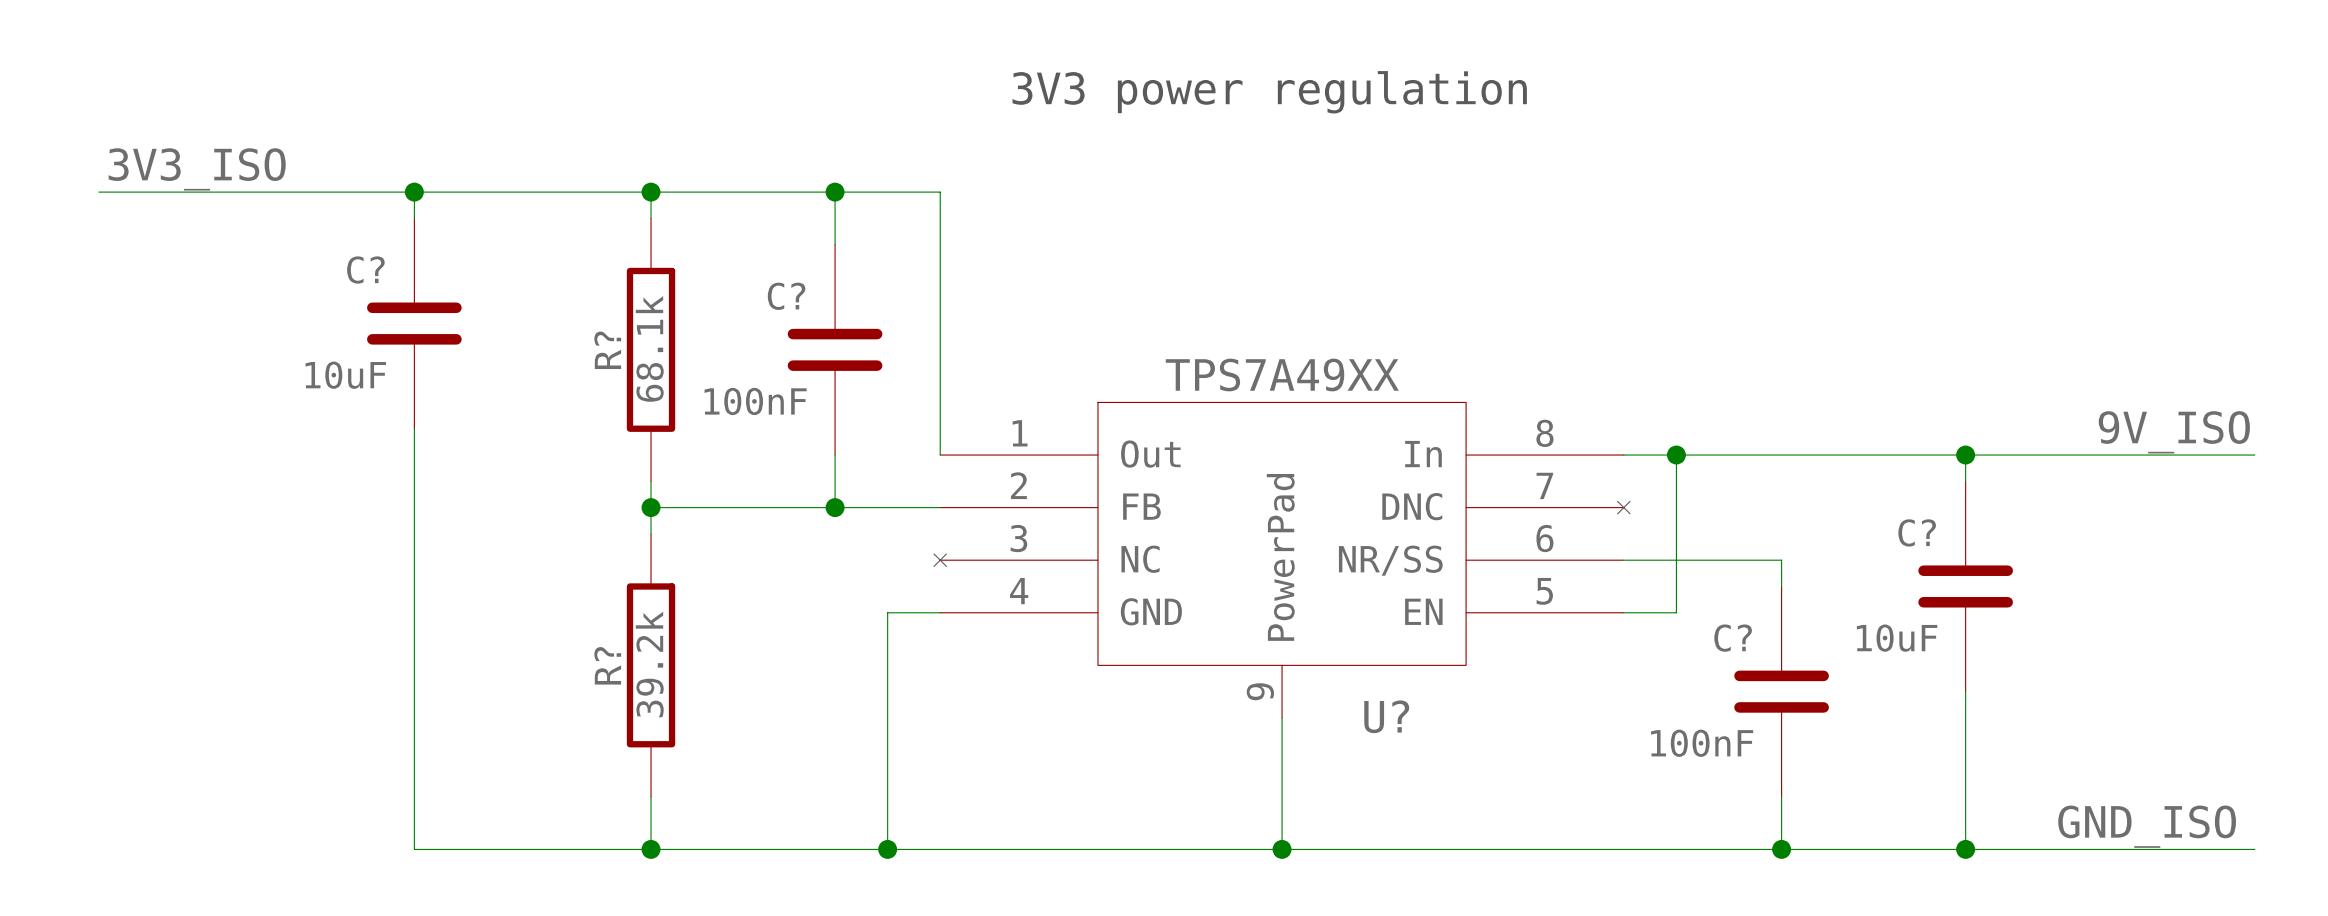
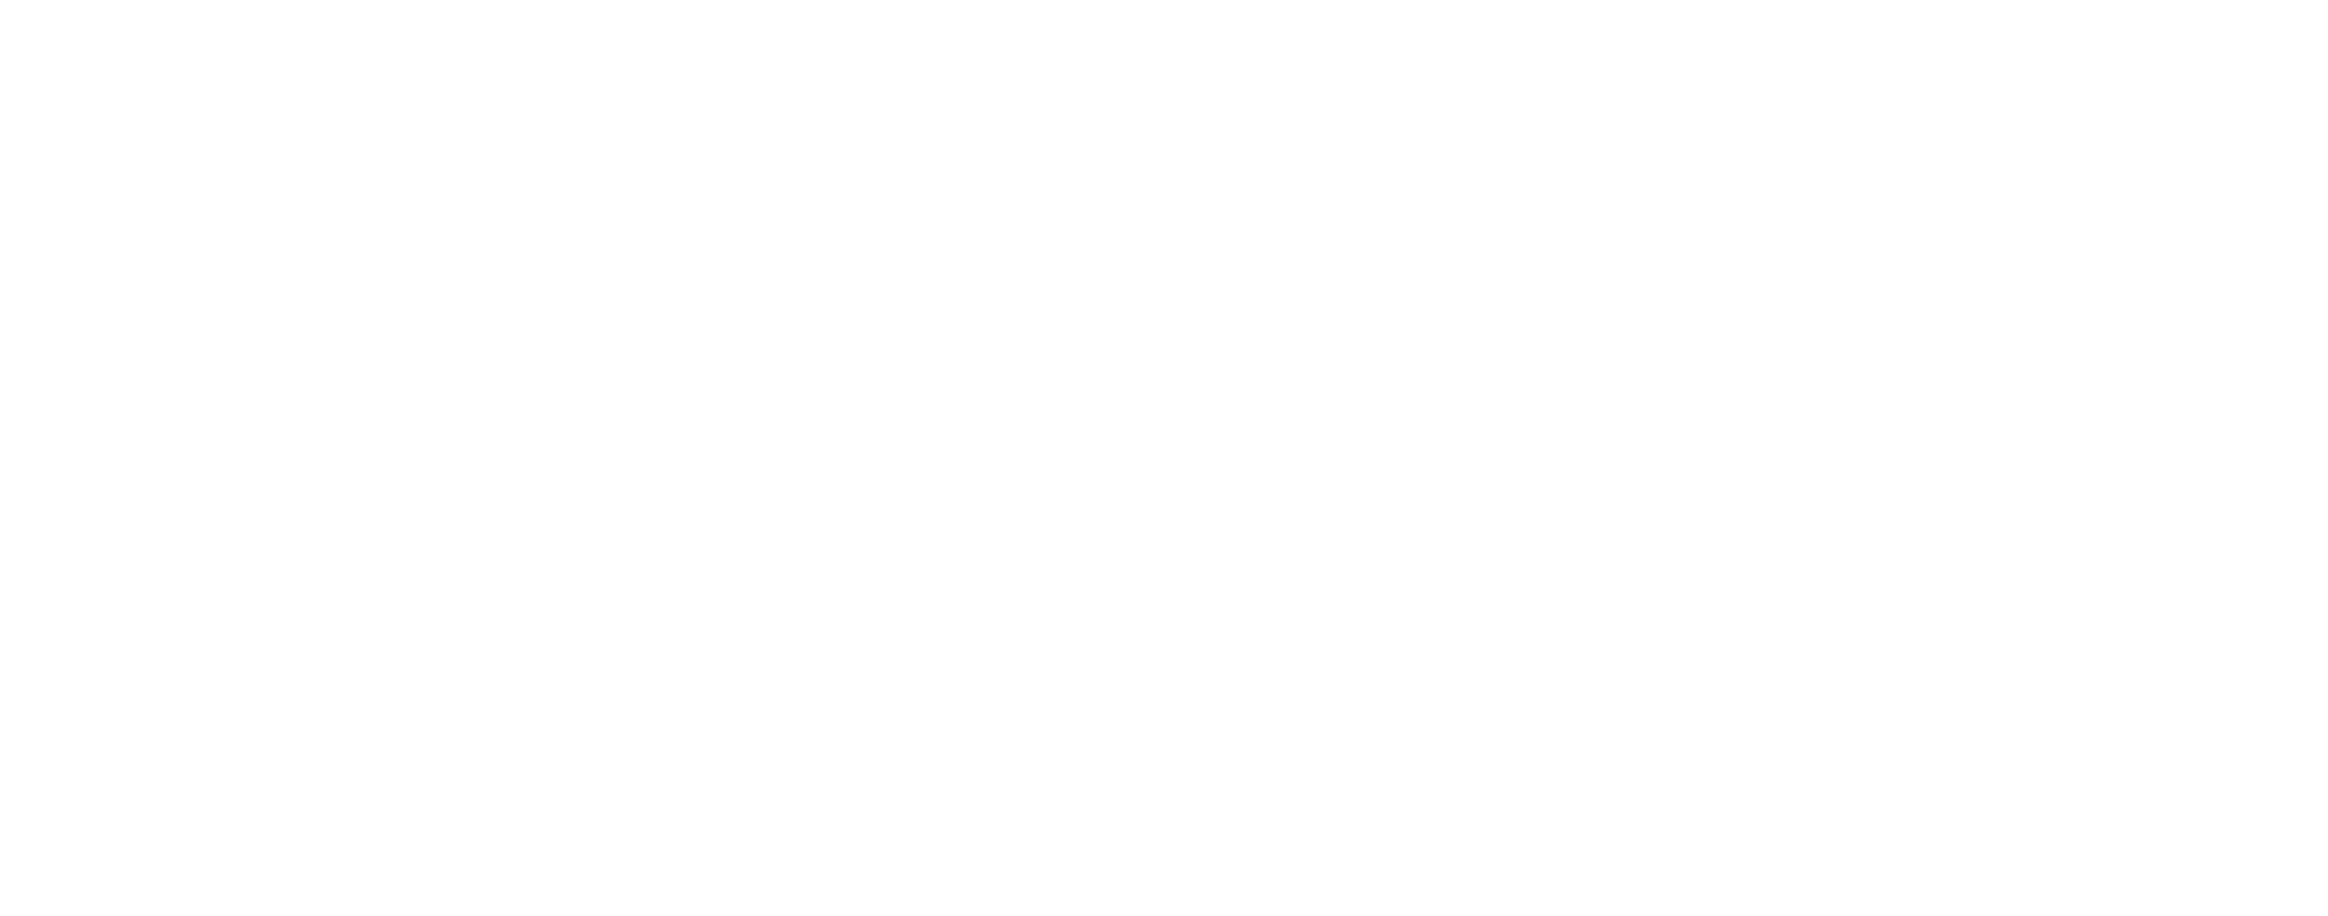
text: 3V3 power regulation (1269, 92) -> none
label: 3V3_ISO (197, 169) -> none
wire: (98, 192) (940, 192) (940, 455) -> none
wire: (414, 192) (414, 218) -> none
junction: (414, 192) -> none
wire: (651, 192) (651, 218) -> none
junction: (651, 192) -> none
wire: (835, 192) (835, 244) -> none
junction: (835, 192) -> none
C?: 10uF (414, 323) -> none
R?: 68.1k (651, 349) -> none
C?: 100nF (835, 349) -> none
wire: (414, 428) (414, 849) (2254, 849) -> none
label: 9V_ISO (2174, 432) -> none
wire: (835, 455) (835, 507) -> none
wire: (1623, 455) (2254, 455) -> none
wire: (1676, 455) (1676, 612) (1623, 612) -> none
junction: (1676, 455) -> none
wire: (1965, 455) (1965, 481) -> none
junction: (1965, 455) -> none
wire: (651, 481) (651, 533) -> none
wire: (651, 507) (940, 507) -> none
junction: (651, 507) -> none
junction: (835, 507) -> none
U?: TPS7A49XX (1282, 560) -> none
wire: (1623, 560) (1781, 560) (1781, 586) -> none
C?: 10uF (1965, 586) -> none
wire: (940, 612) (887, 612) (887, 849) -> none
R?: 39.2k (651, 665) -> none
C?: 100nF (1781, 691) -> none
wire: (1965, 691) (1965, 849) -> none
wire: (1282, 717) (1282, 849) -> none
wire: (651, 796) (651, 849) -> none
wire: (1781, 796) (1781, 849) -> none
label: GND_ISO (2147, 826) -> none
junction: (651, 849) -> none
junction: (887, 849) -> none
junction: (1282, 849) -> none
junction: (1781, 849) -> none
junction: (1965, 849) -> none

